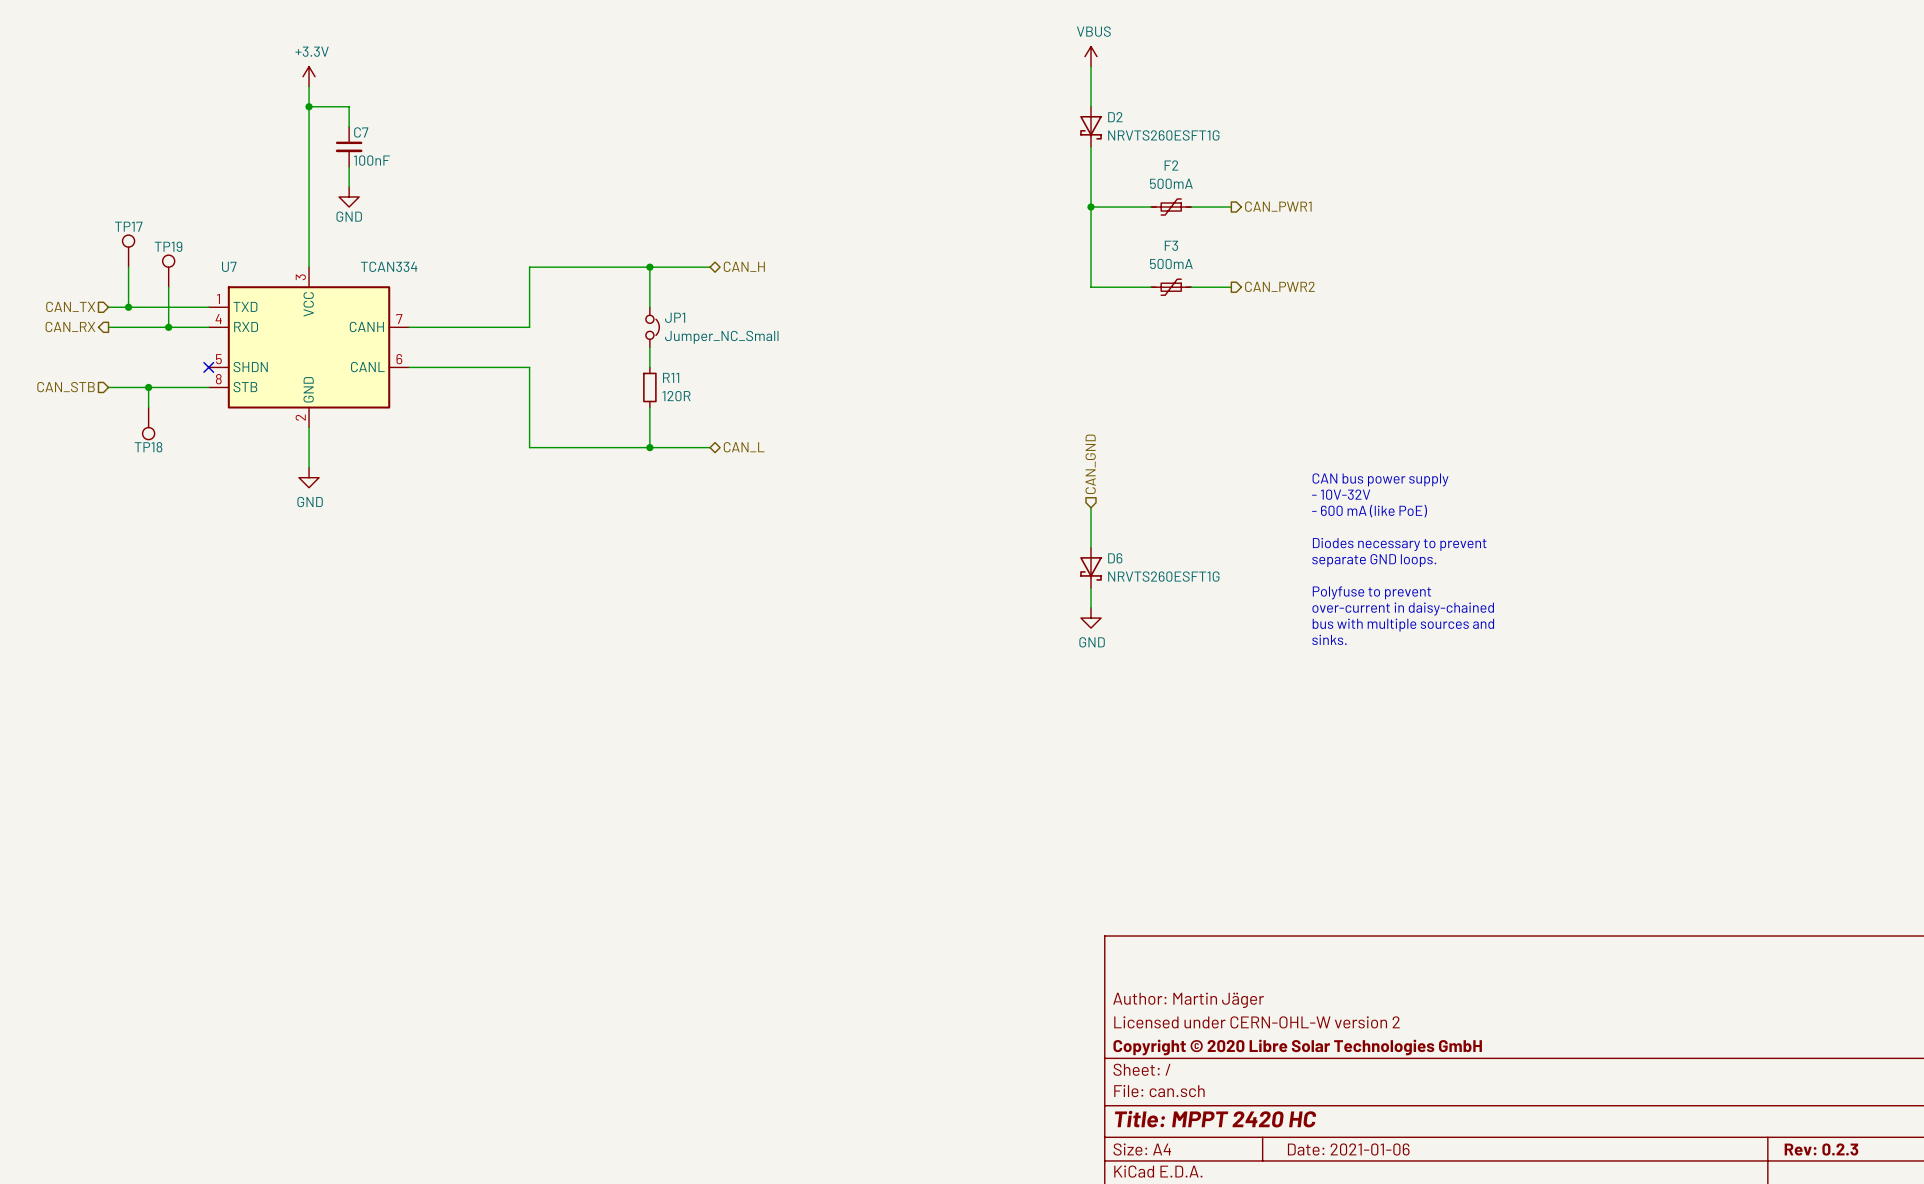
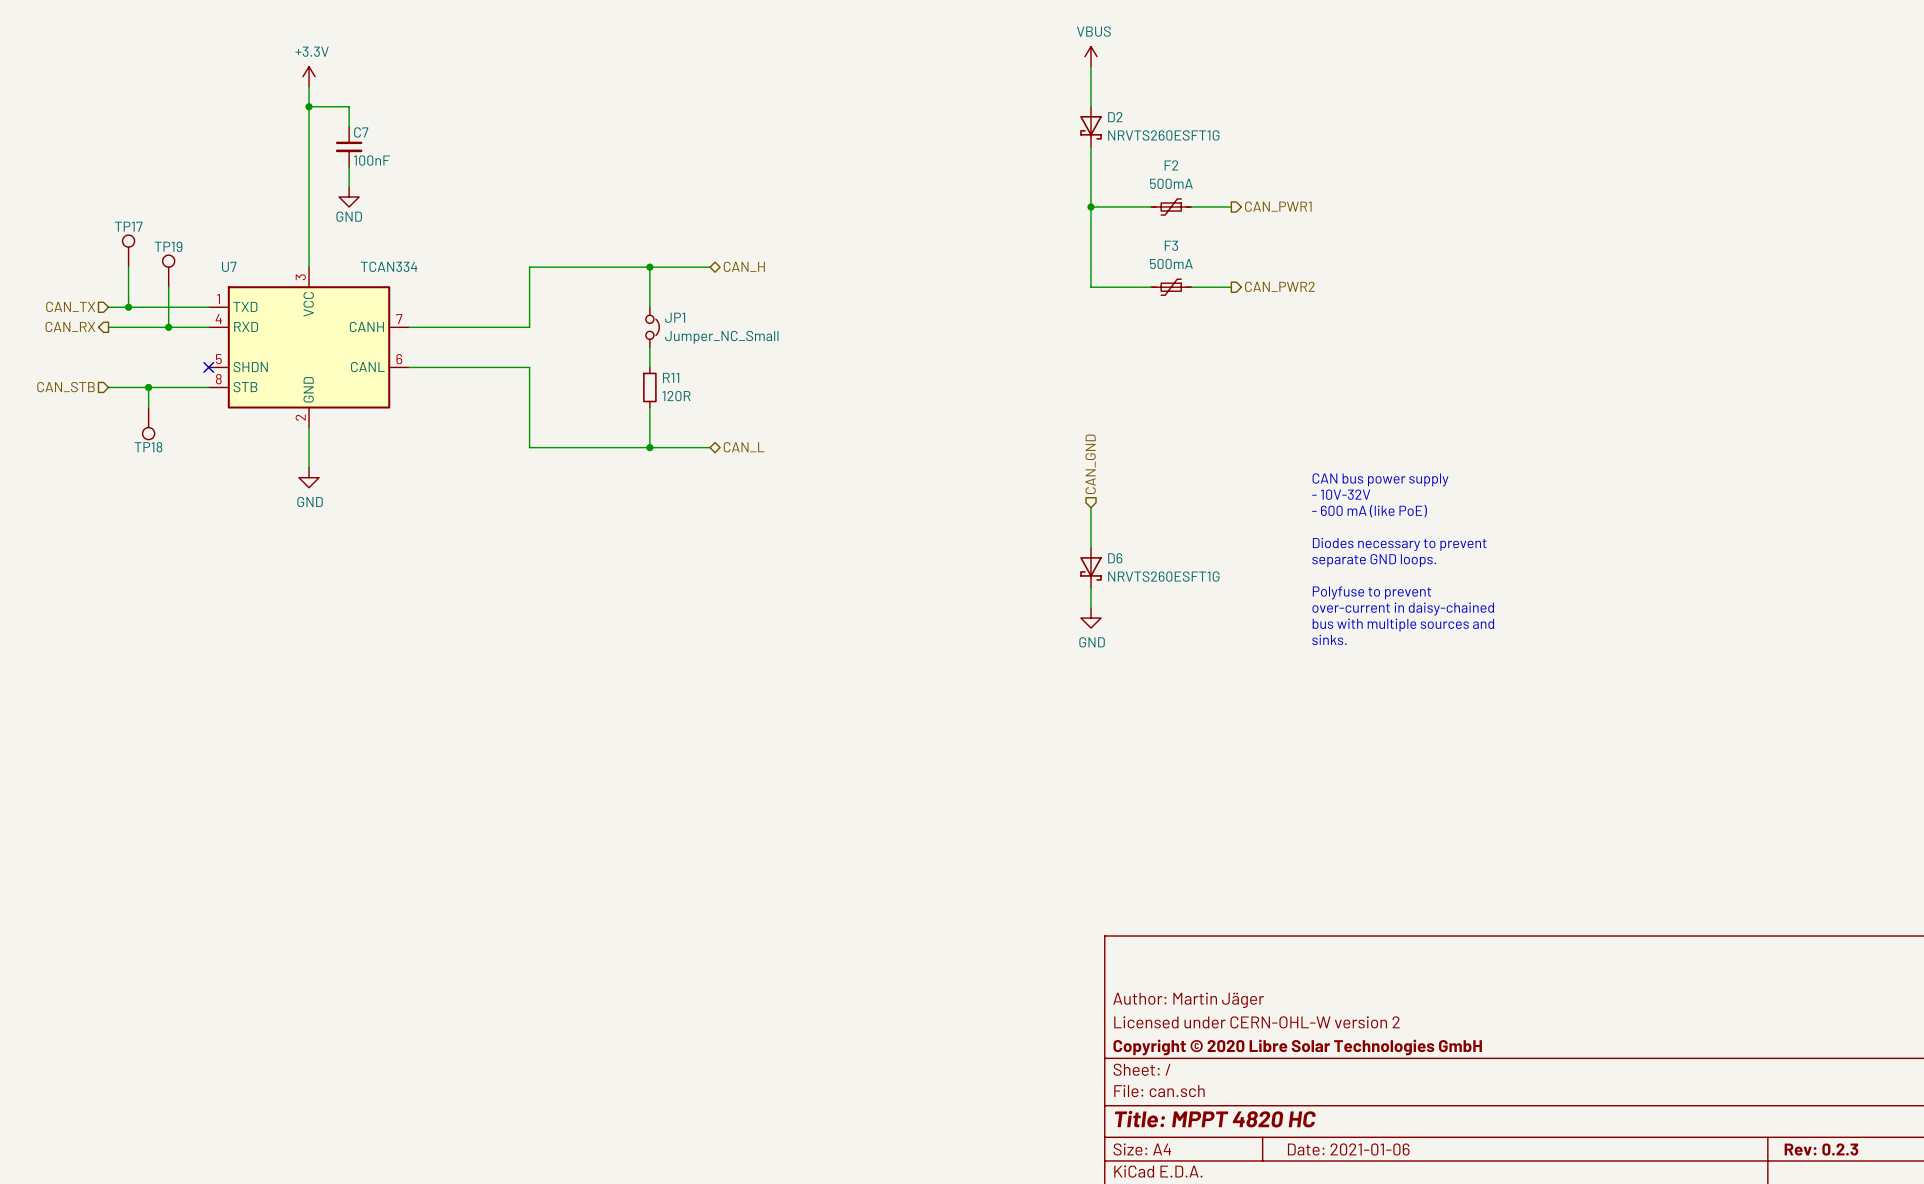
title block: Title: MPPT 2420 HC (1215, 1119) -> Title: MPPT 4820 HC (1215, 1119)

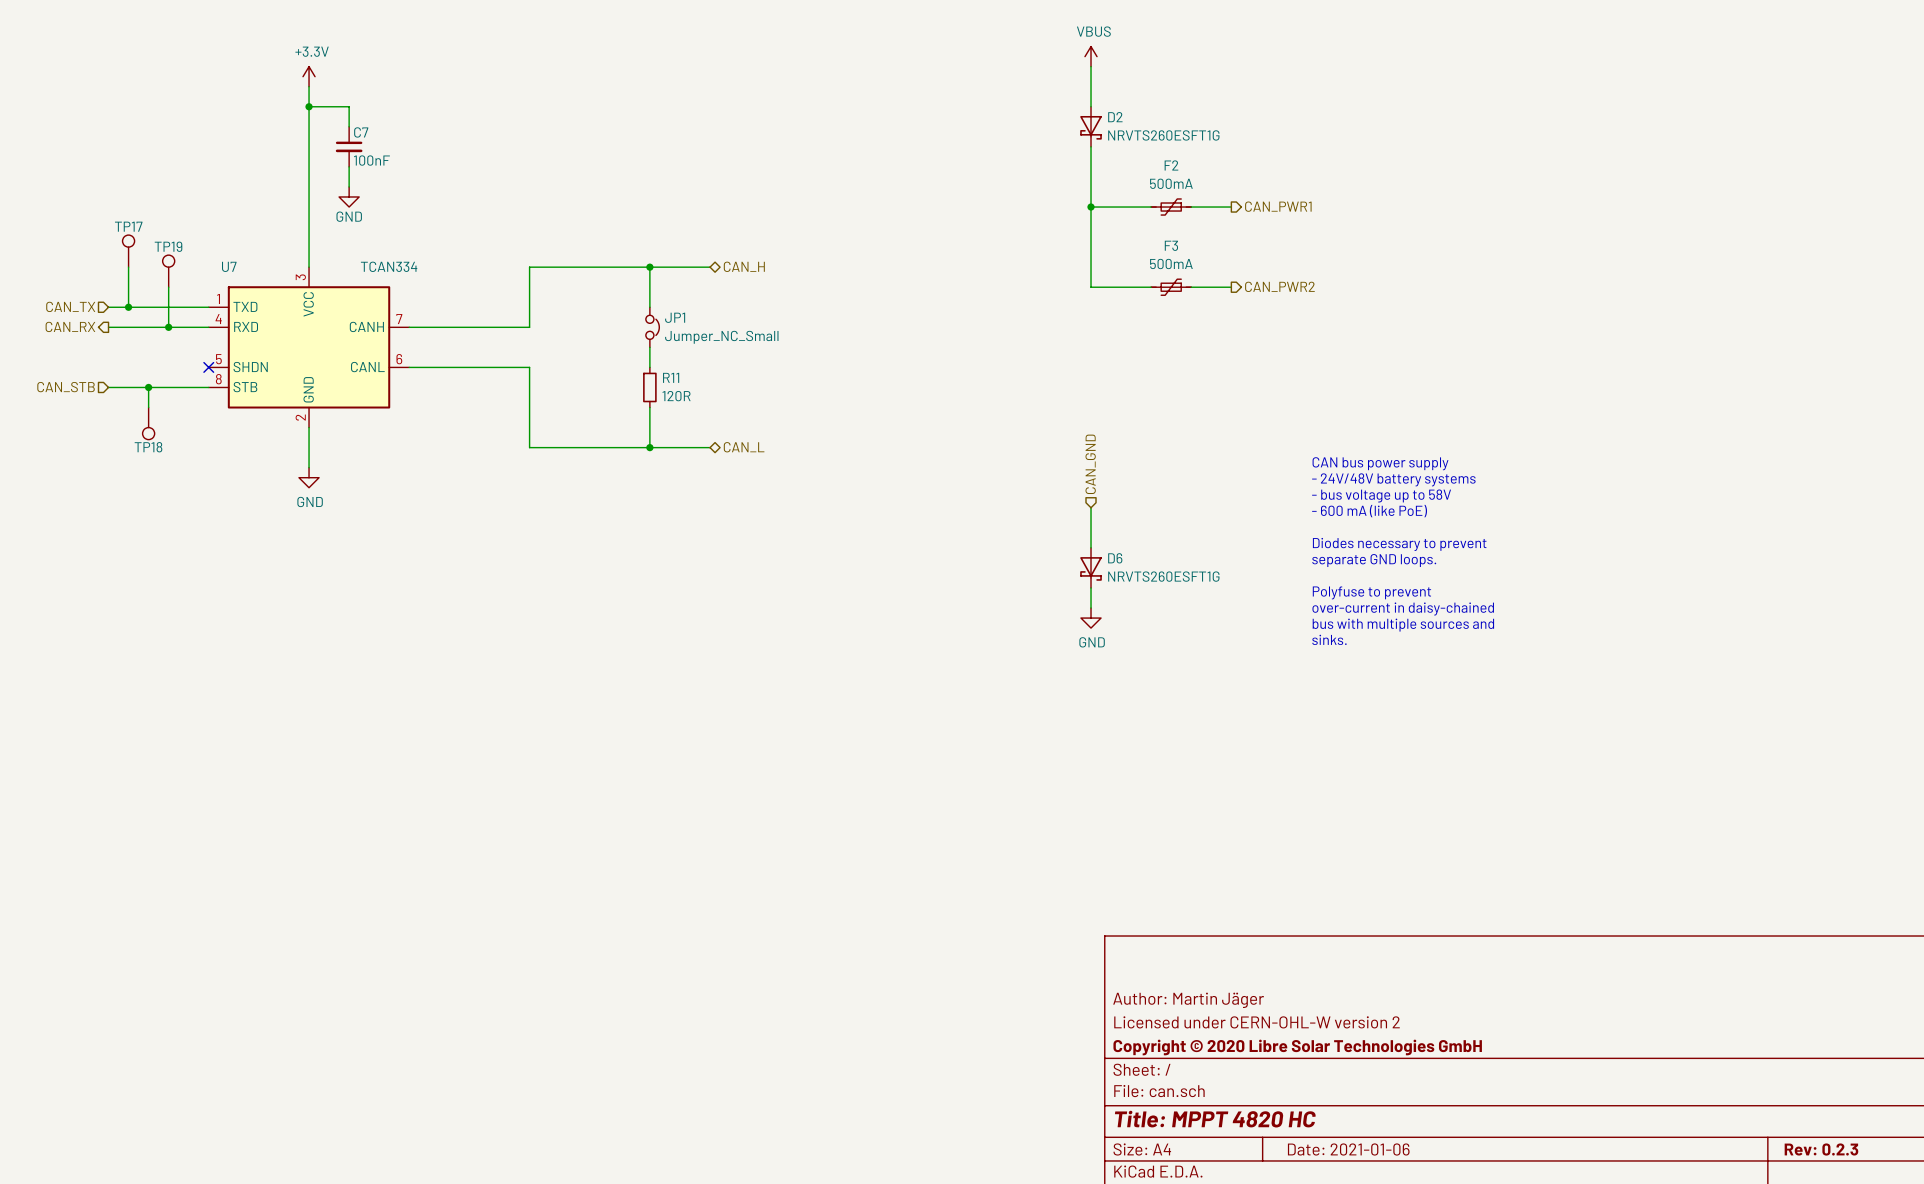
text: none -> CAN bus power supply (1380, 463)
text: CAN bus power supply (1380, 479) -> - 24V/48V battery systems (1393, 479)
text: - 10V-32V (1341, 494) -> - bus voltage up to 58V (1381, 496)

